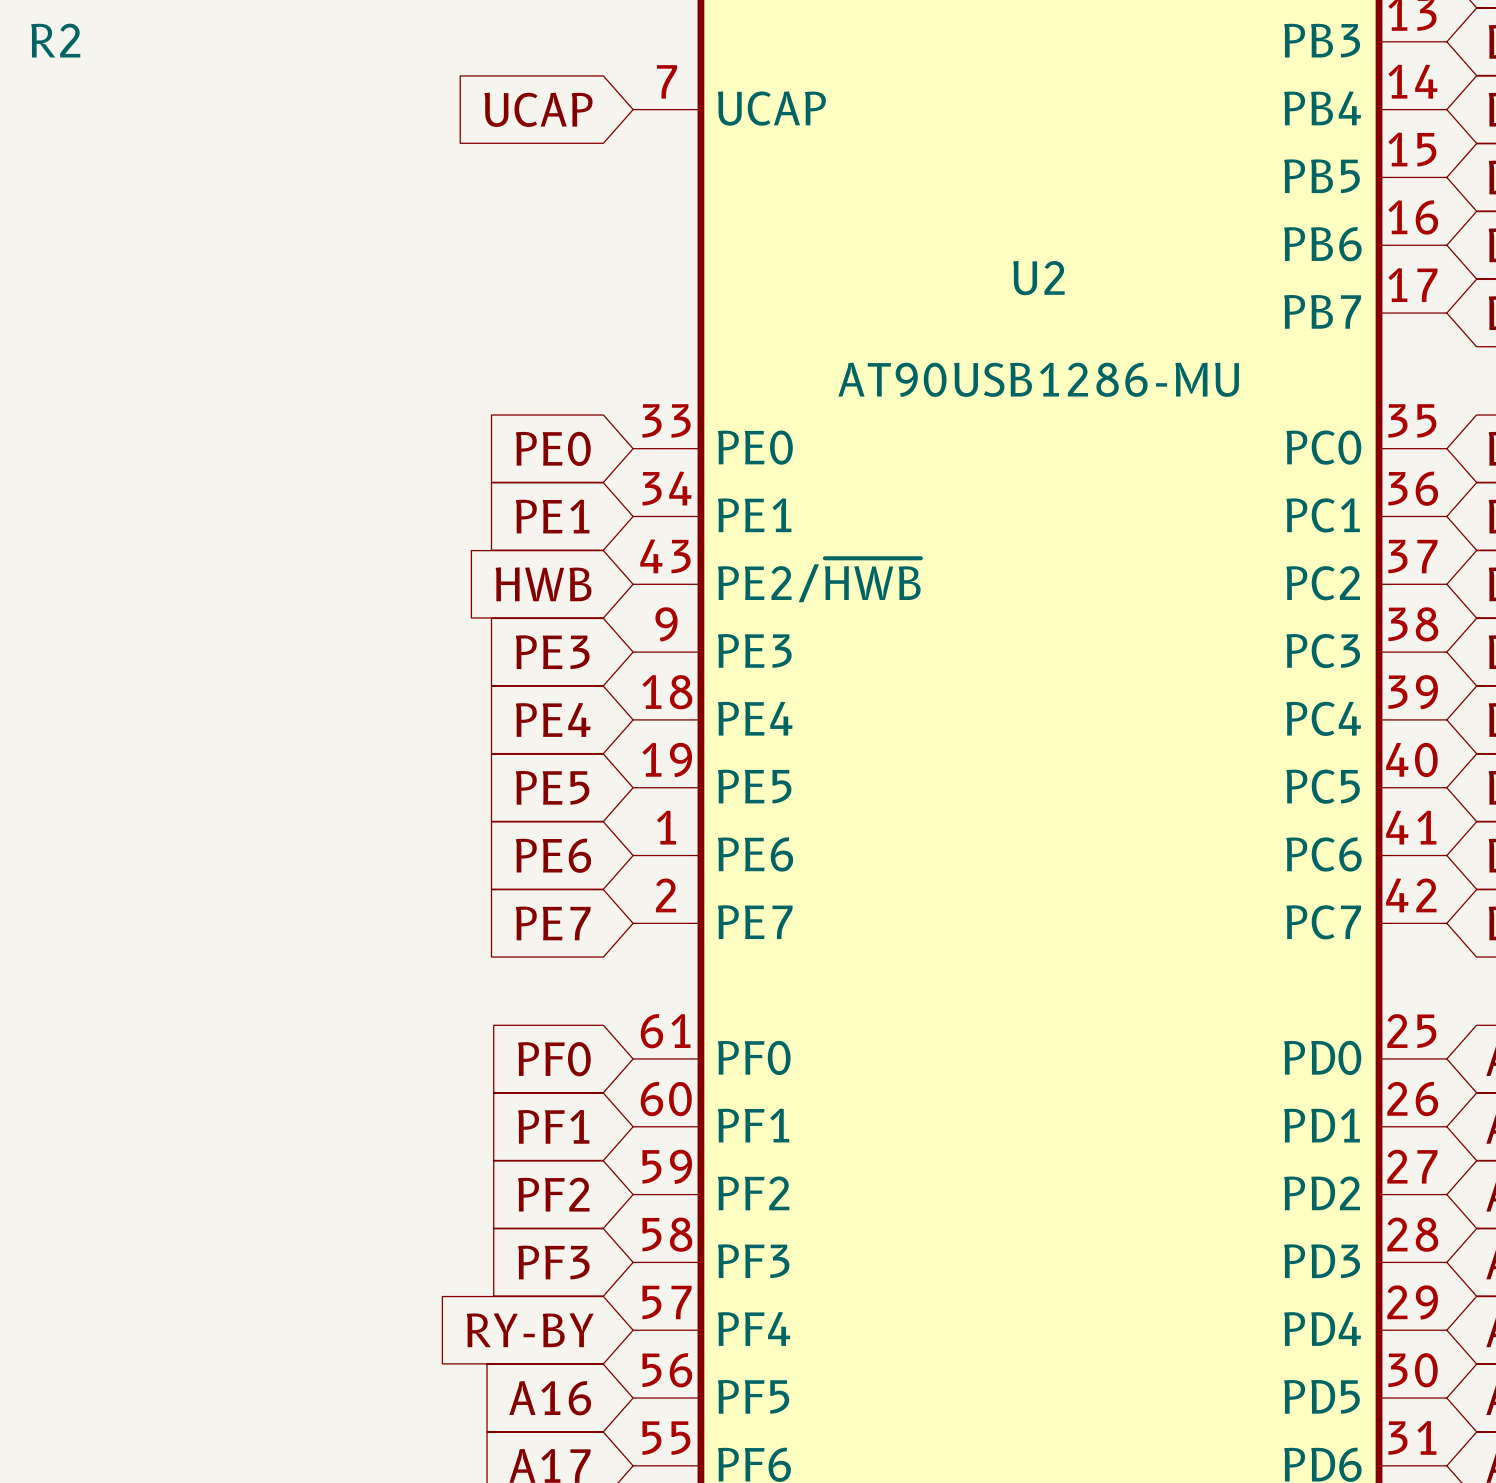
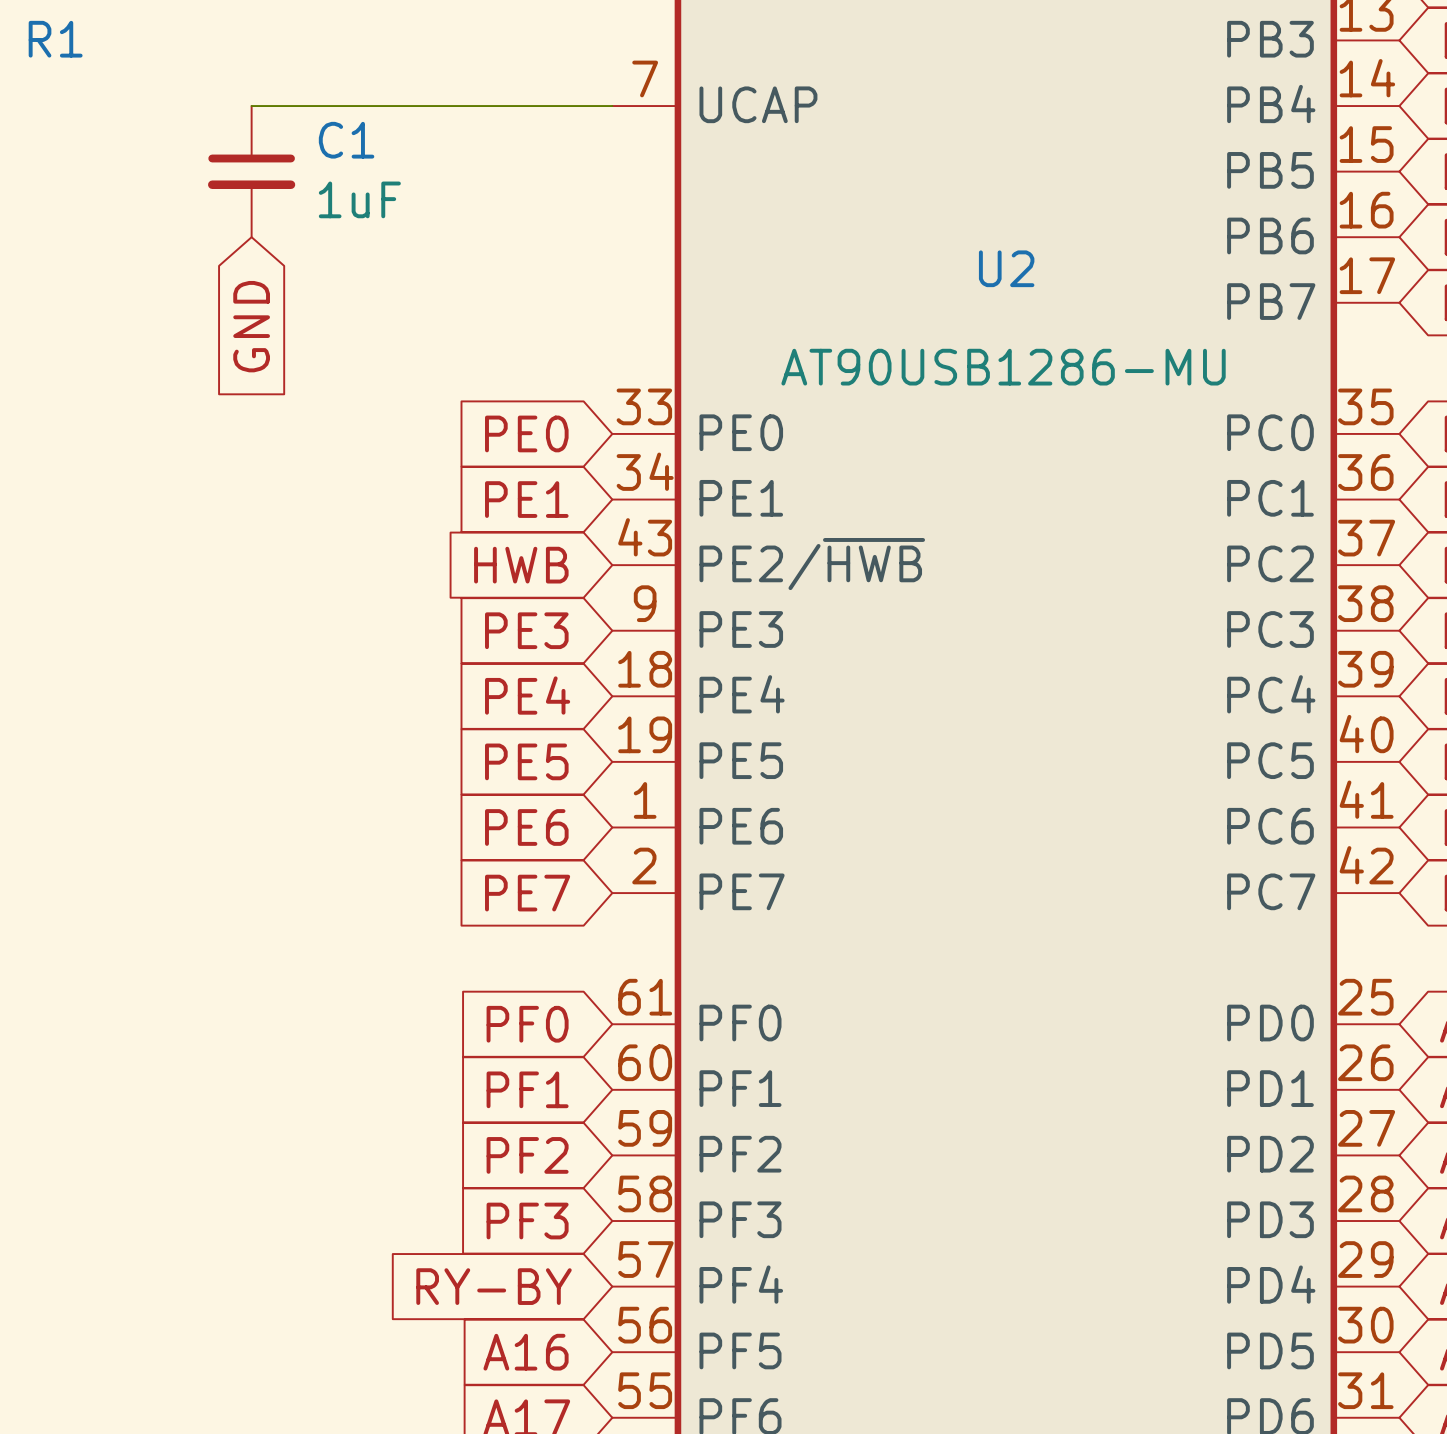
R2 name: R2 (55, 40) -> R1 (55, 39)
wire: none -> (251, 106) (612, 106)
global label: UCAP (538, 109) -> none
C1: none -> 1uF (251, 171)
global label: none -> GND (251, 326)

